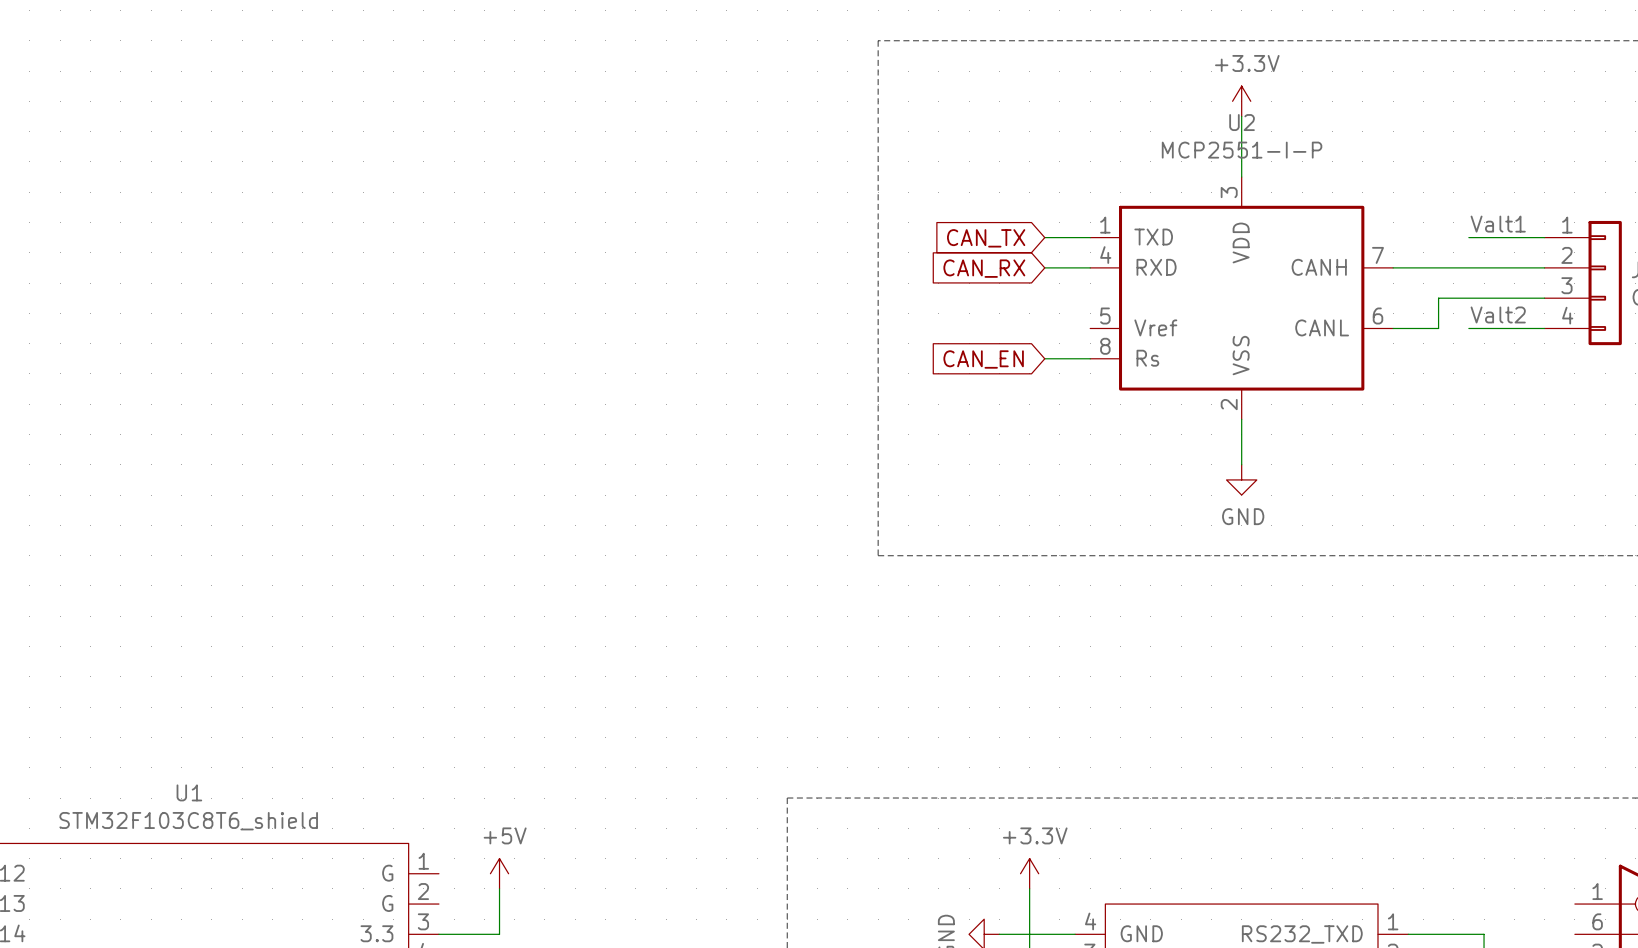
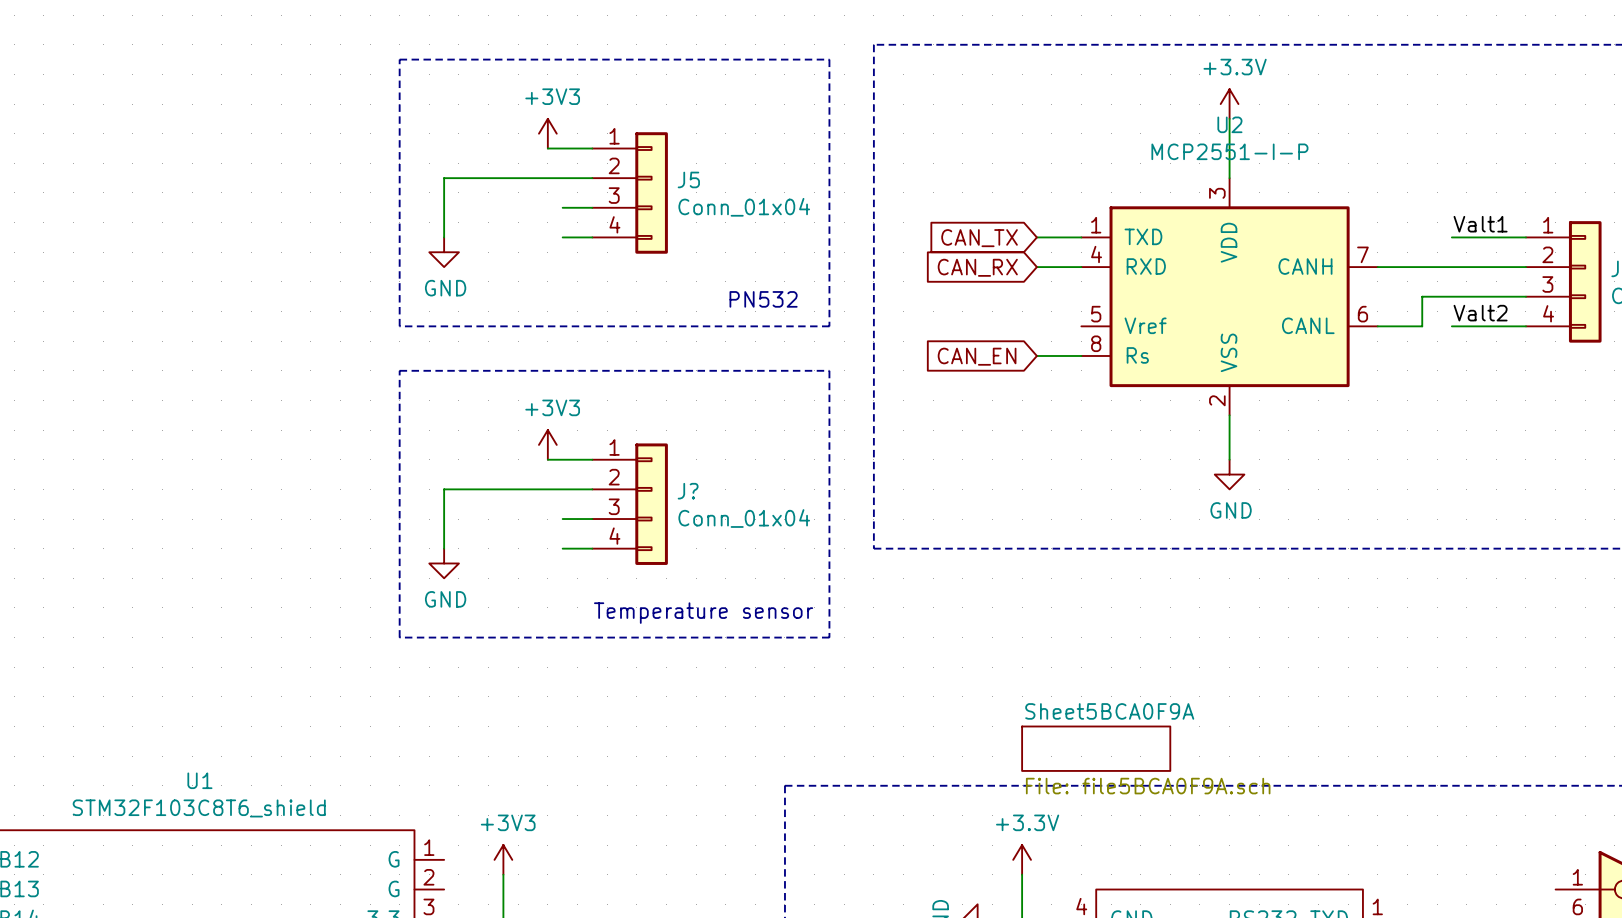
line: none -> (399, 59) (399, 326) (829, 326) (829, 59) (399, 59)
power symbol: none -> +3V3 (547, 133)
wire: none -> (547, 148) (592, 148)
wire: none -> (592, 178) (444, 178) (444, 237)
J5: none -> Conn_01x04 (630, 192)
wire: none -> (562, 207) (592, 207)
wire: none -> (562, 237) (592, 237)
power symbol: none -> GND (444, 252)
text: none -> PN532 (763, 299)
line: none -> (399, 370) (399, 637) (829, 637) (829, 370) (399, 370)
power symbol: none -> +3V3 (547, 444)
wire: none -> (547, 459) (592, 459)
wire: none -> (592, 489) (444, 489) (444, 548)
J?: none -> Conn_01x04 (630, 504)
wire: none -> (562, 519) (592, 519)
wire: none -> (562, 548) (592, 548)
power symbol: none -> GND (444, 563)
text: none -> Temperature sensor (703, 613)
sheet Sheet5BCA0F9A: none -> File: file5BCA0F9A.sch (1096, 748)
power symbol: +5V (499, 873) -> +3V3 (503, 859)

